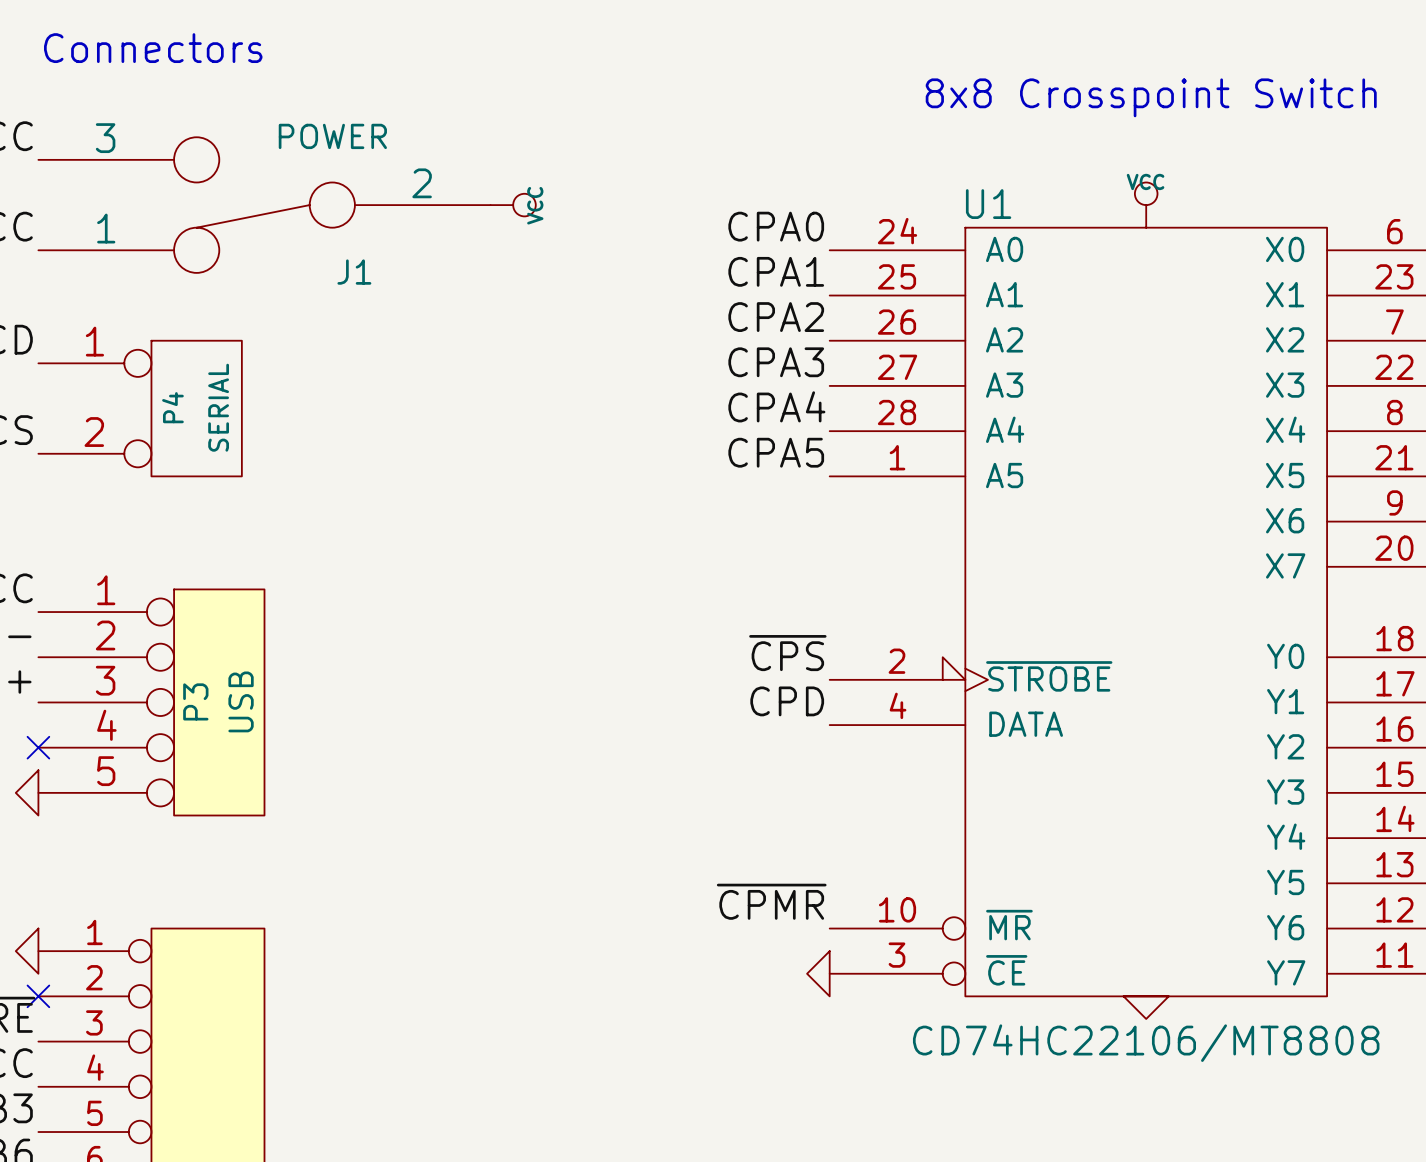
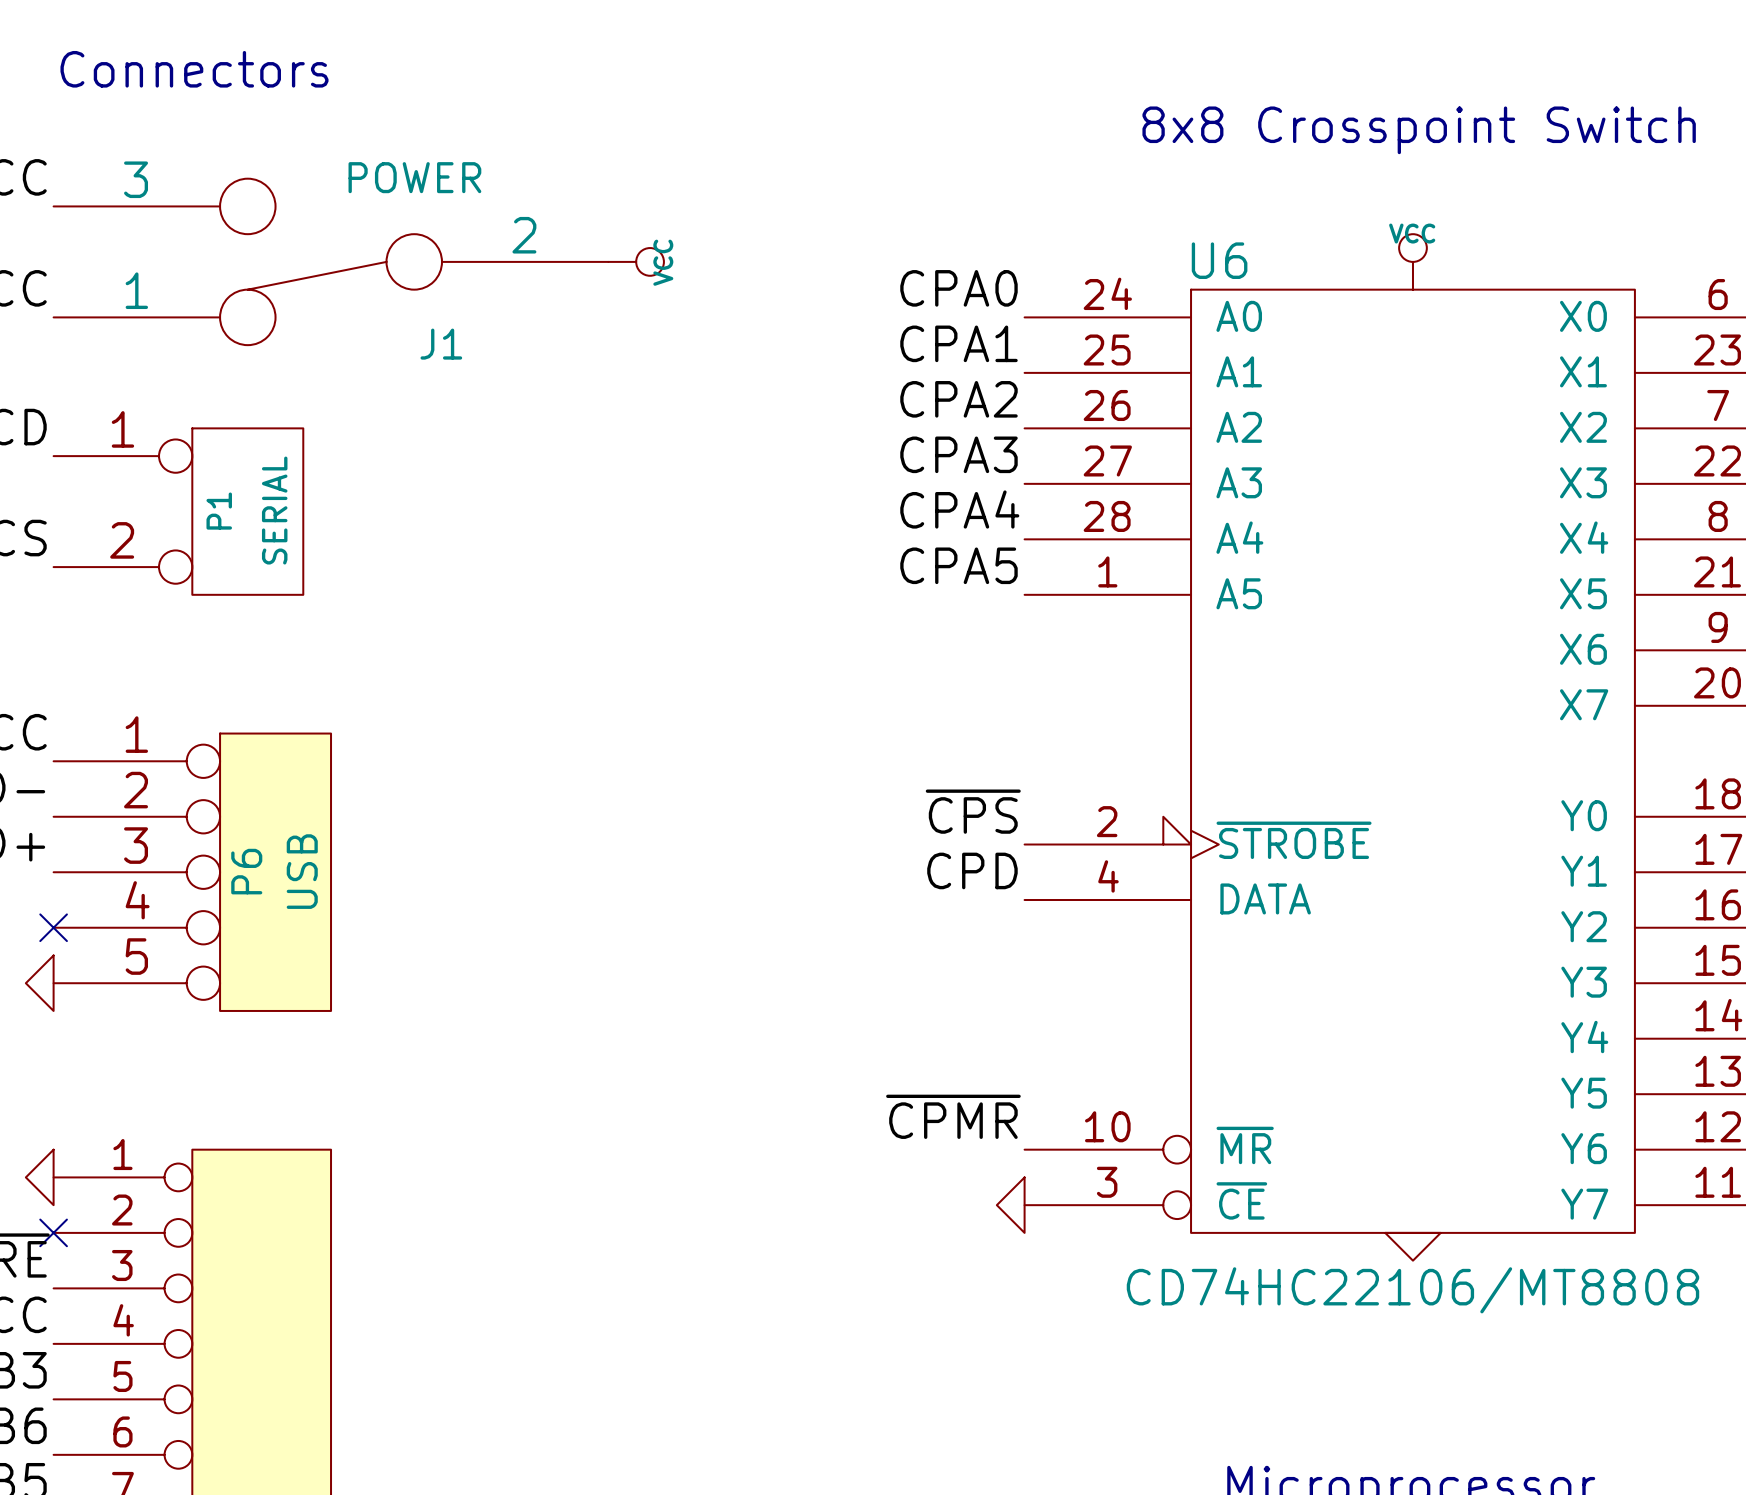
U1 name: U1 (988, 204) -> U6 (1219, 260)
P4 name: P4 (172, 407) -> P1 (219, 511)
P3 name: P3 (195, 701) -> P6 (246, 871)

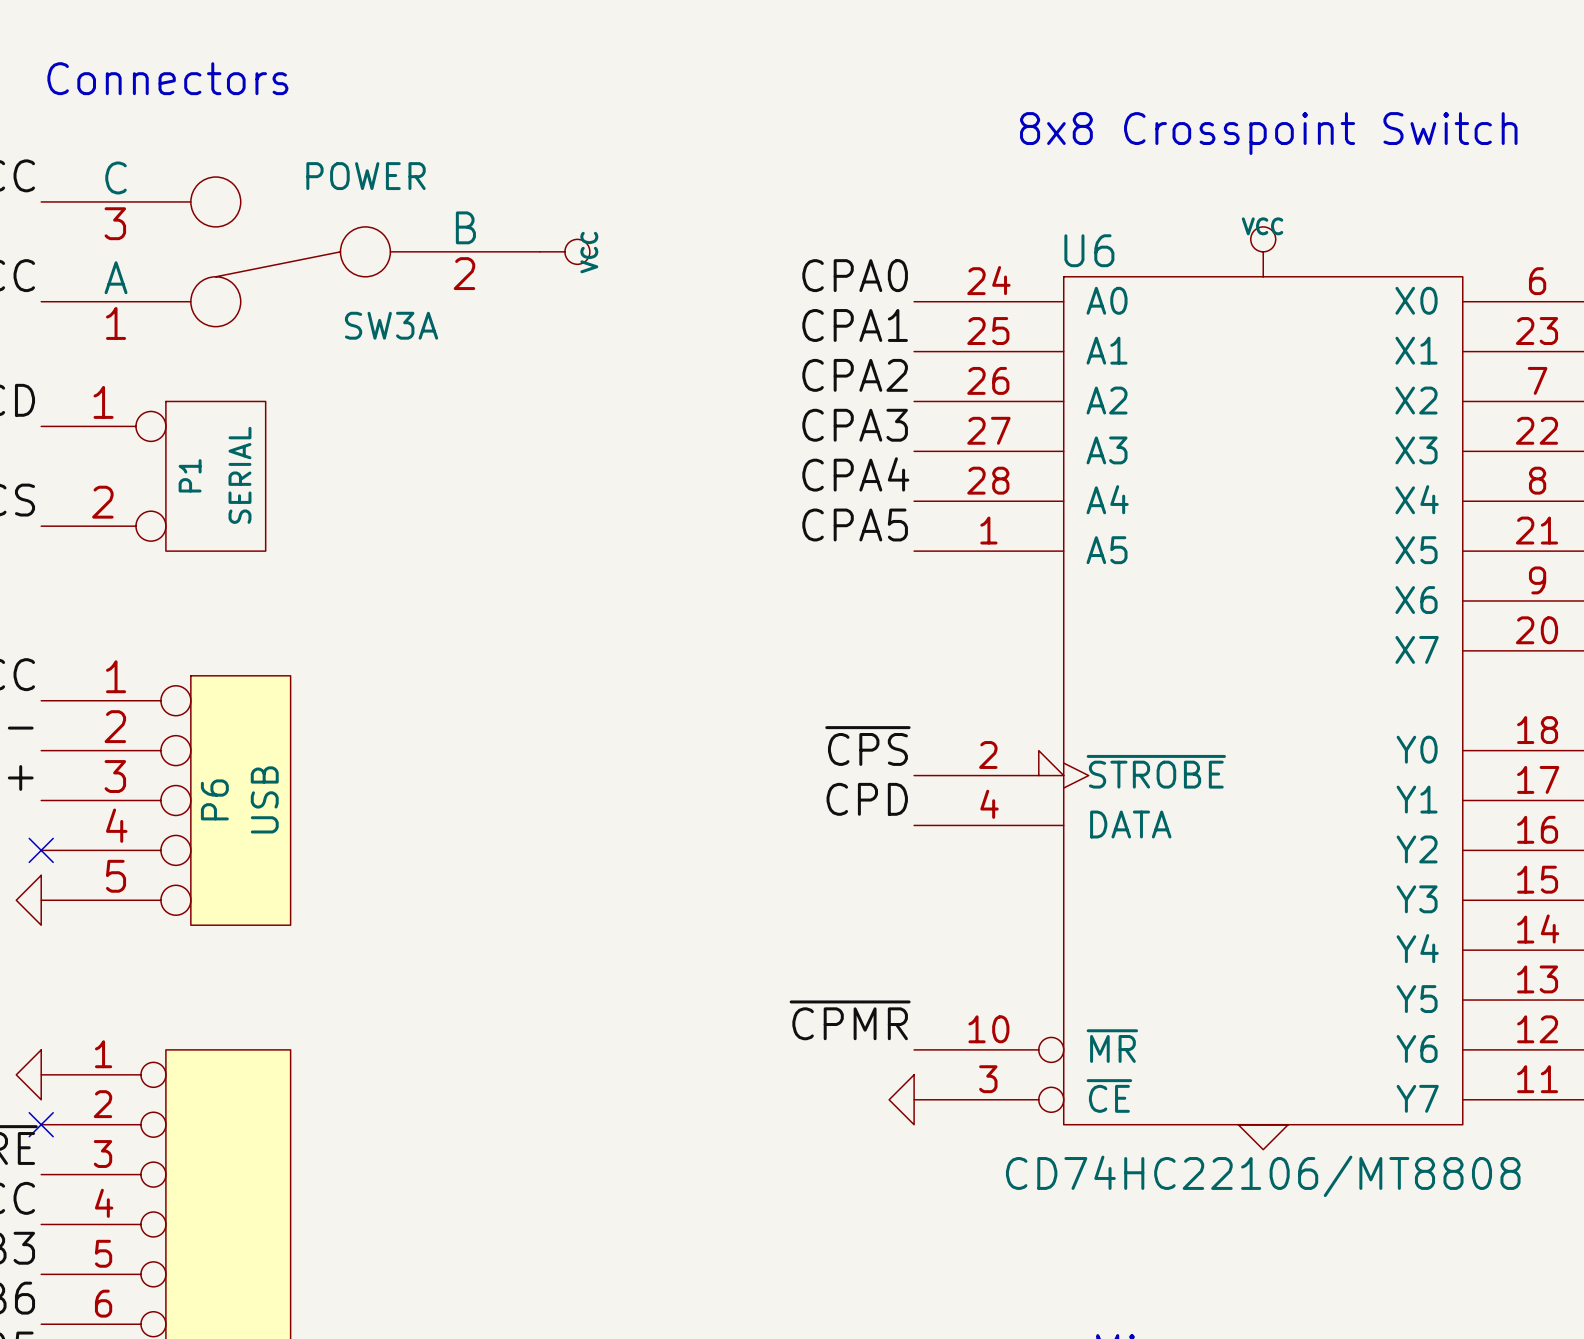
J1 pin name: 3 (136, 179) -> C (116, 177)
J1 pin number: none -> 3 (115, 223)
J1 pin name: 2 (524, 235) -> B (465, 227)
J1 pin number: none -> 2 (464, 273)
J1 pin name: 1 (136, 290) -> A (116, 277)
J1 pin number: none -> 1 (116, 323)
J1 name: J1 (441, 344) -> SW3A (391, 325)

